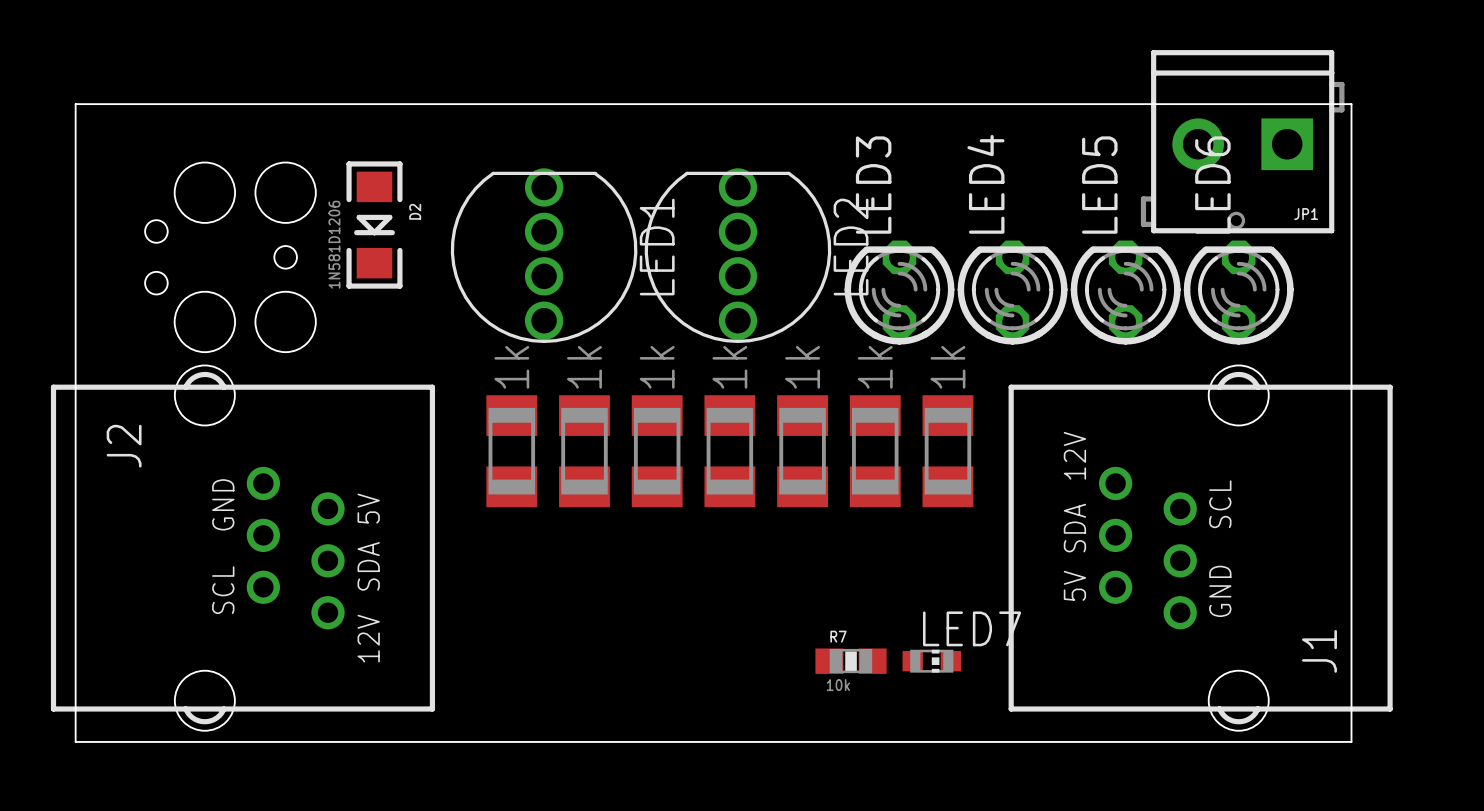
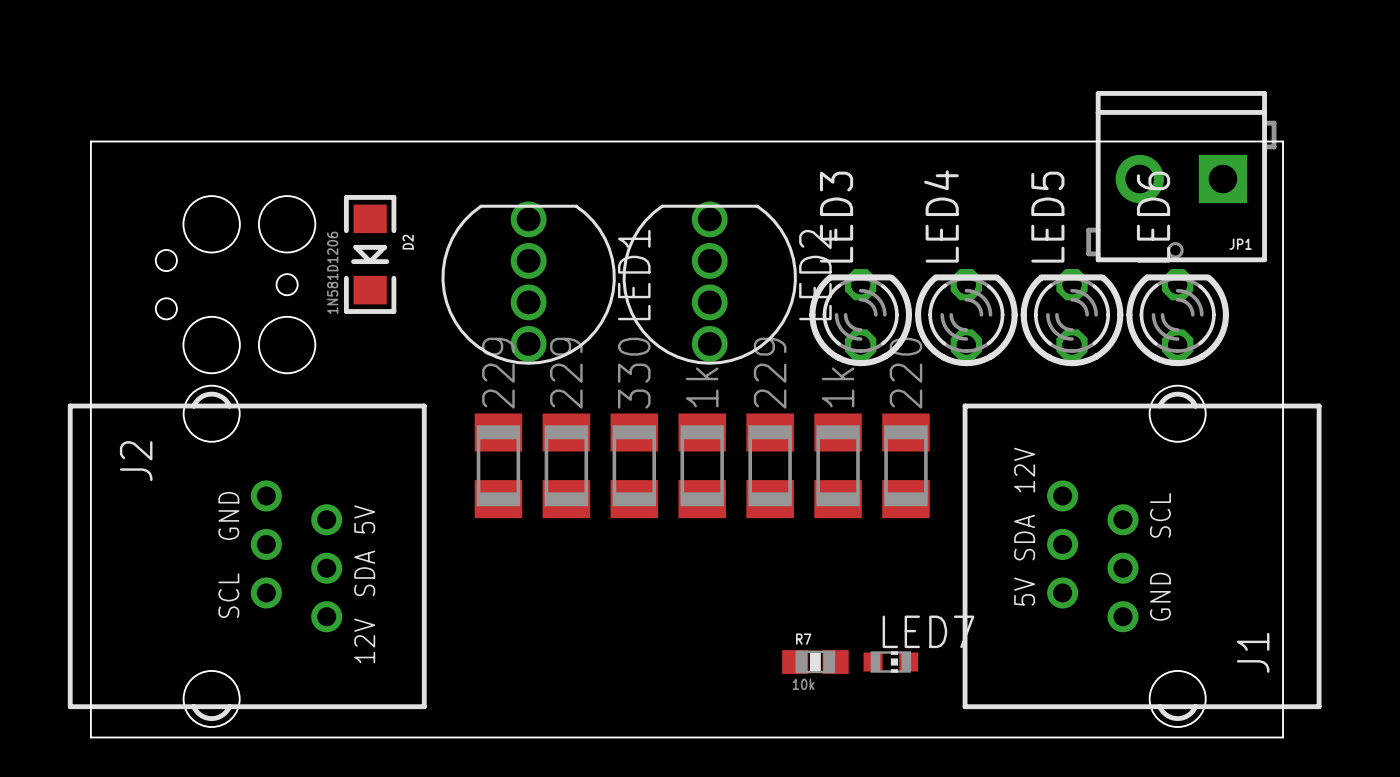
part value: 1k (511, 367) -> 229 (498, 373)
part value: 1k (584, 367) -> 229 (566, 373)
part value: 1k (657, 367) -> 330 (634, 373)
part value: 1k (802, 367) -> 229 (770, 373)
part value: 1k (947, 367) -> 220 (905, 373)

